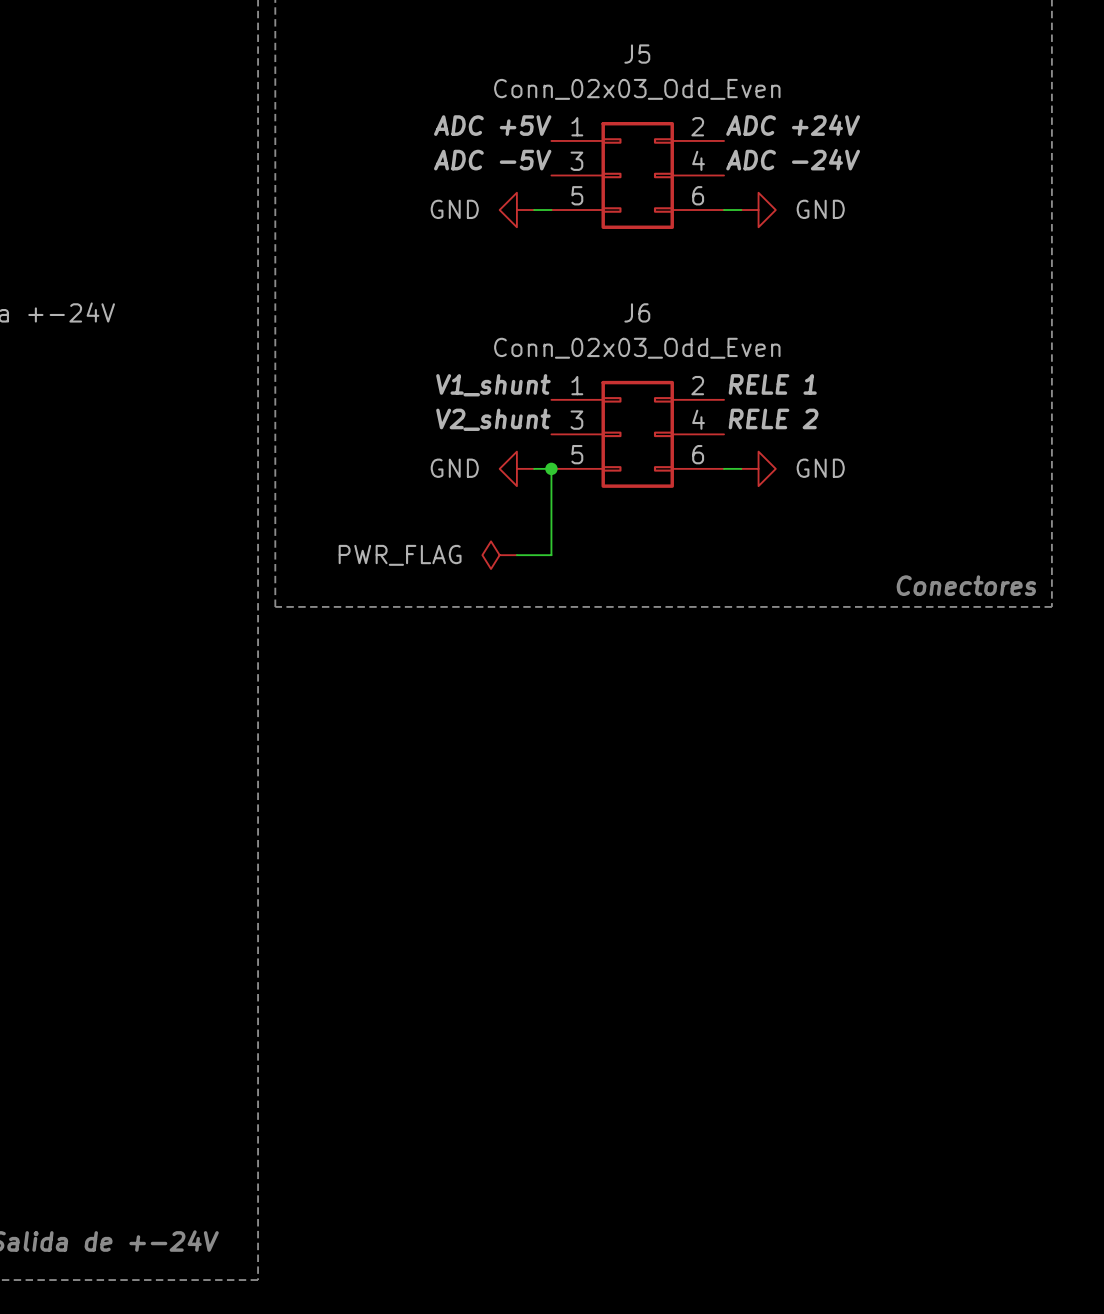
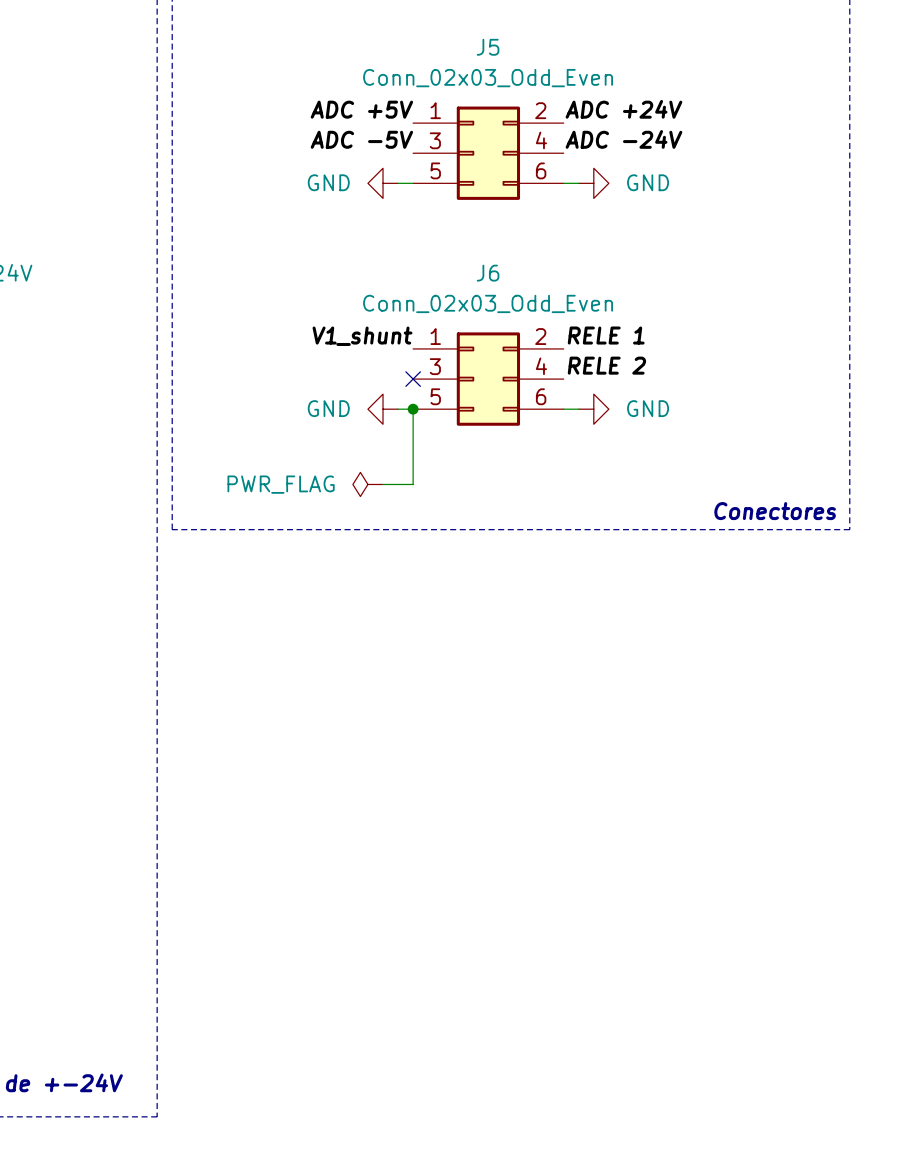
label: V2_shunt (493, 419) -> none
no-connect mark: none -> (413, 379)

